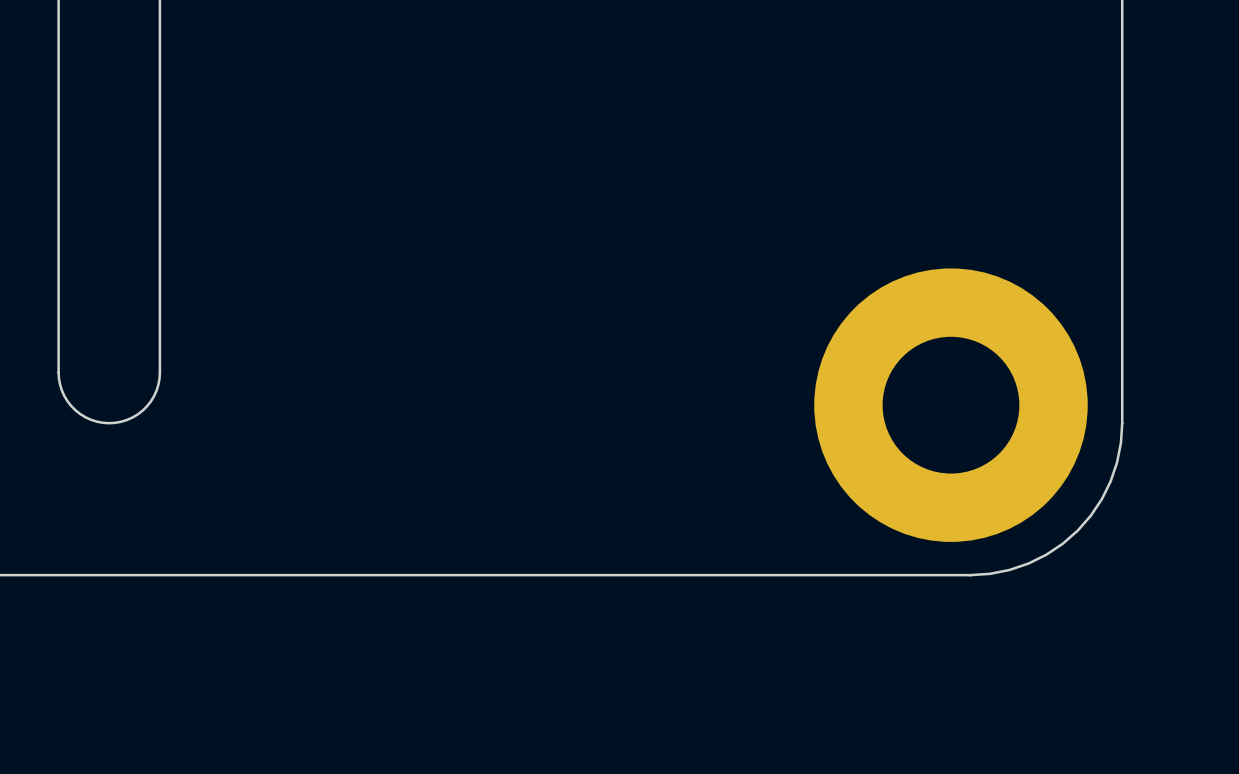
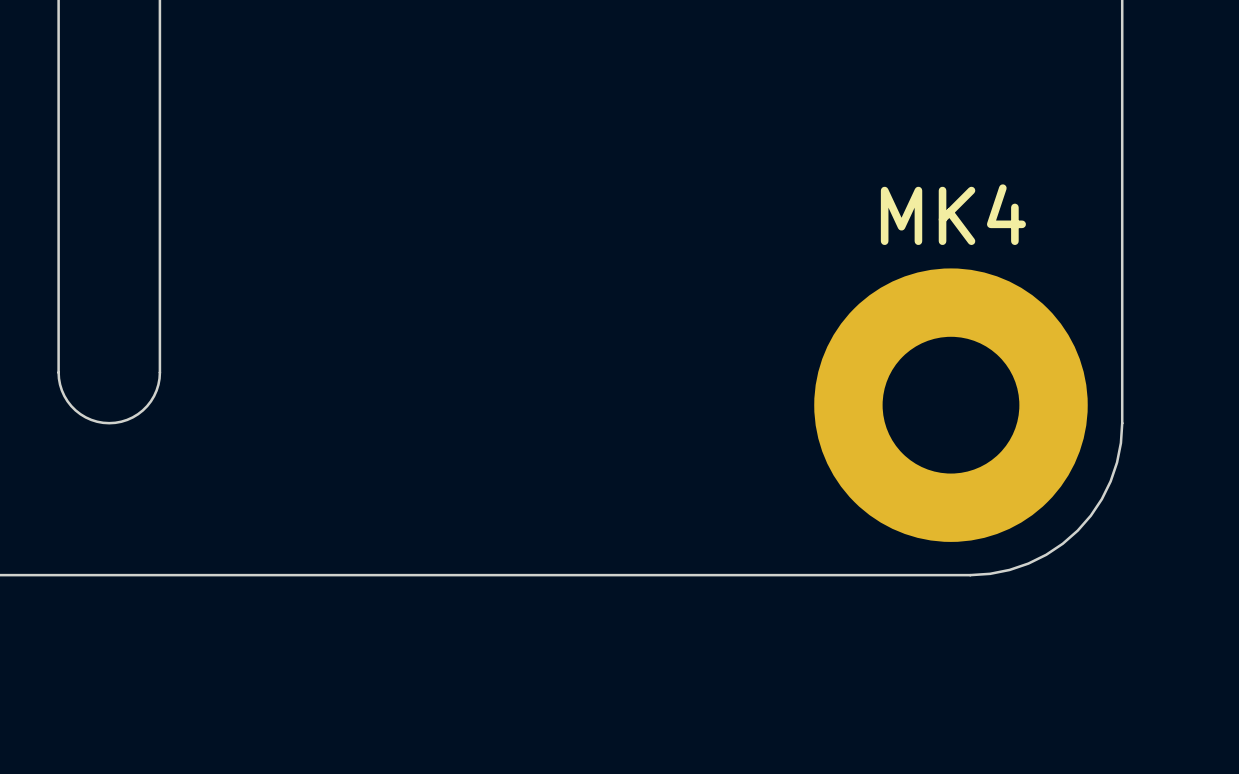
MK4 name: none -> MK4 (953, 214)

